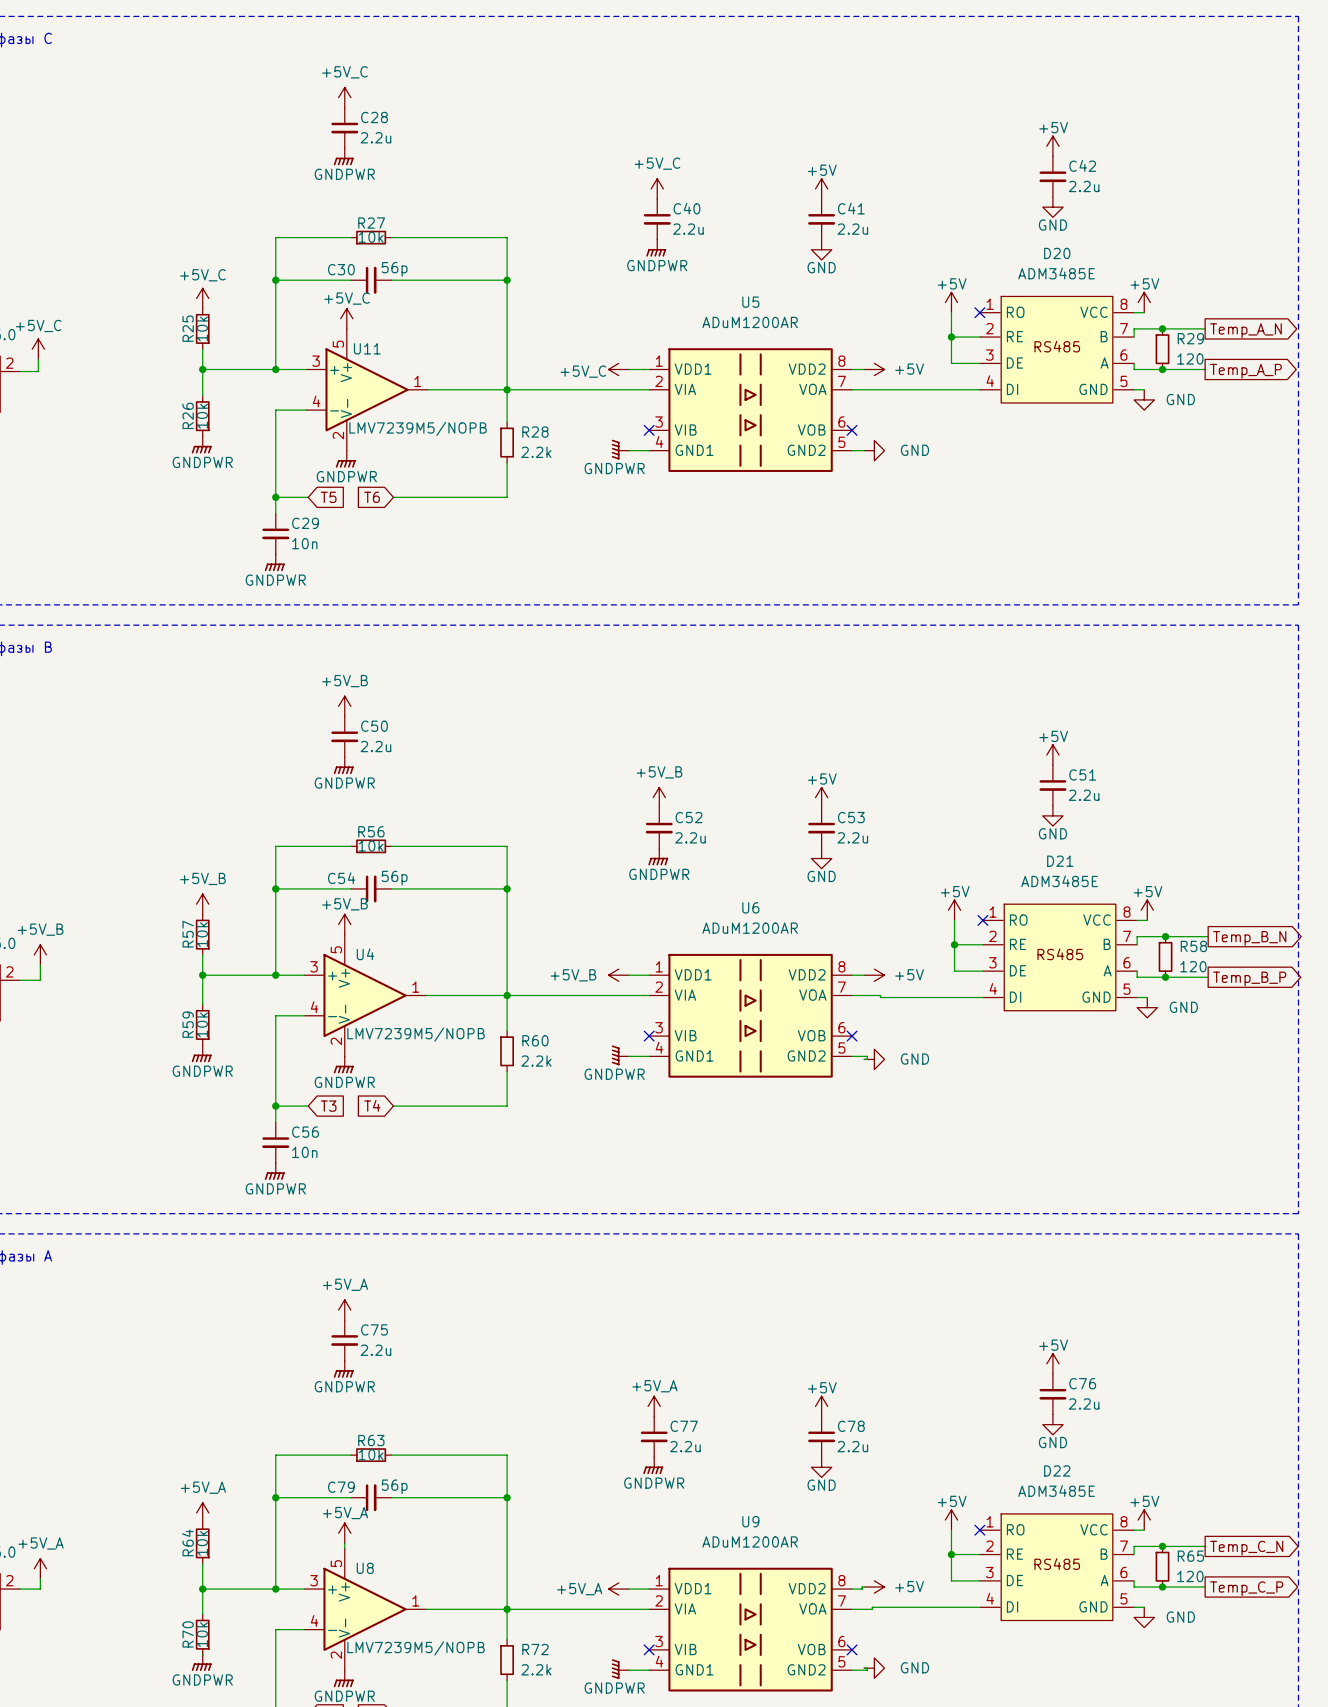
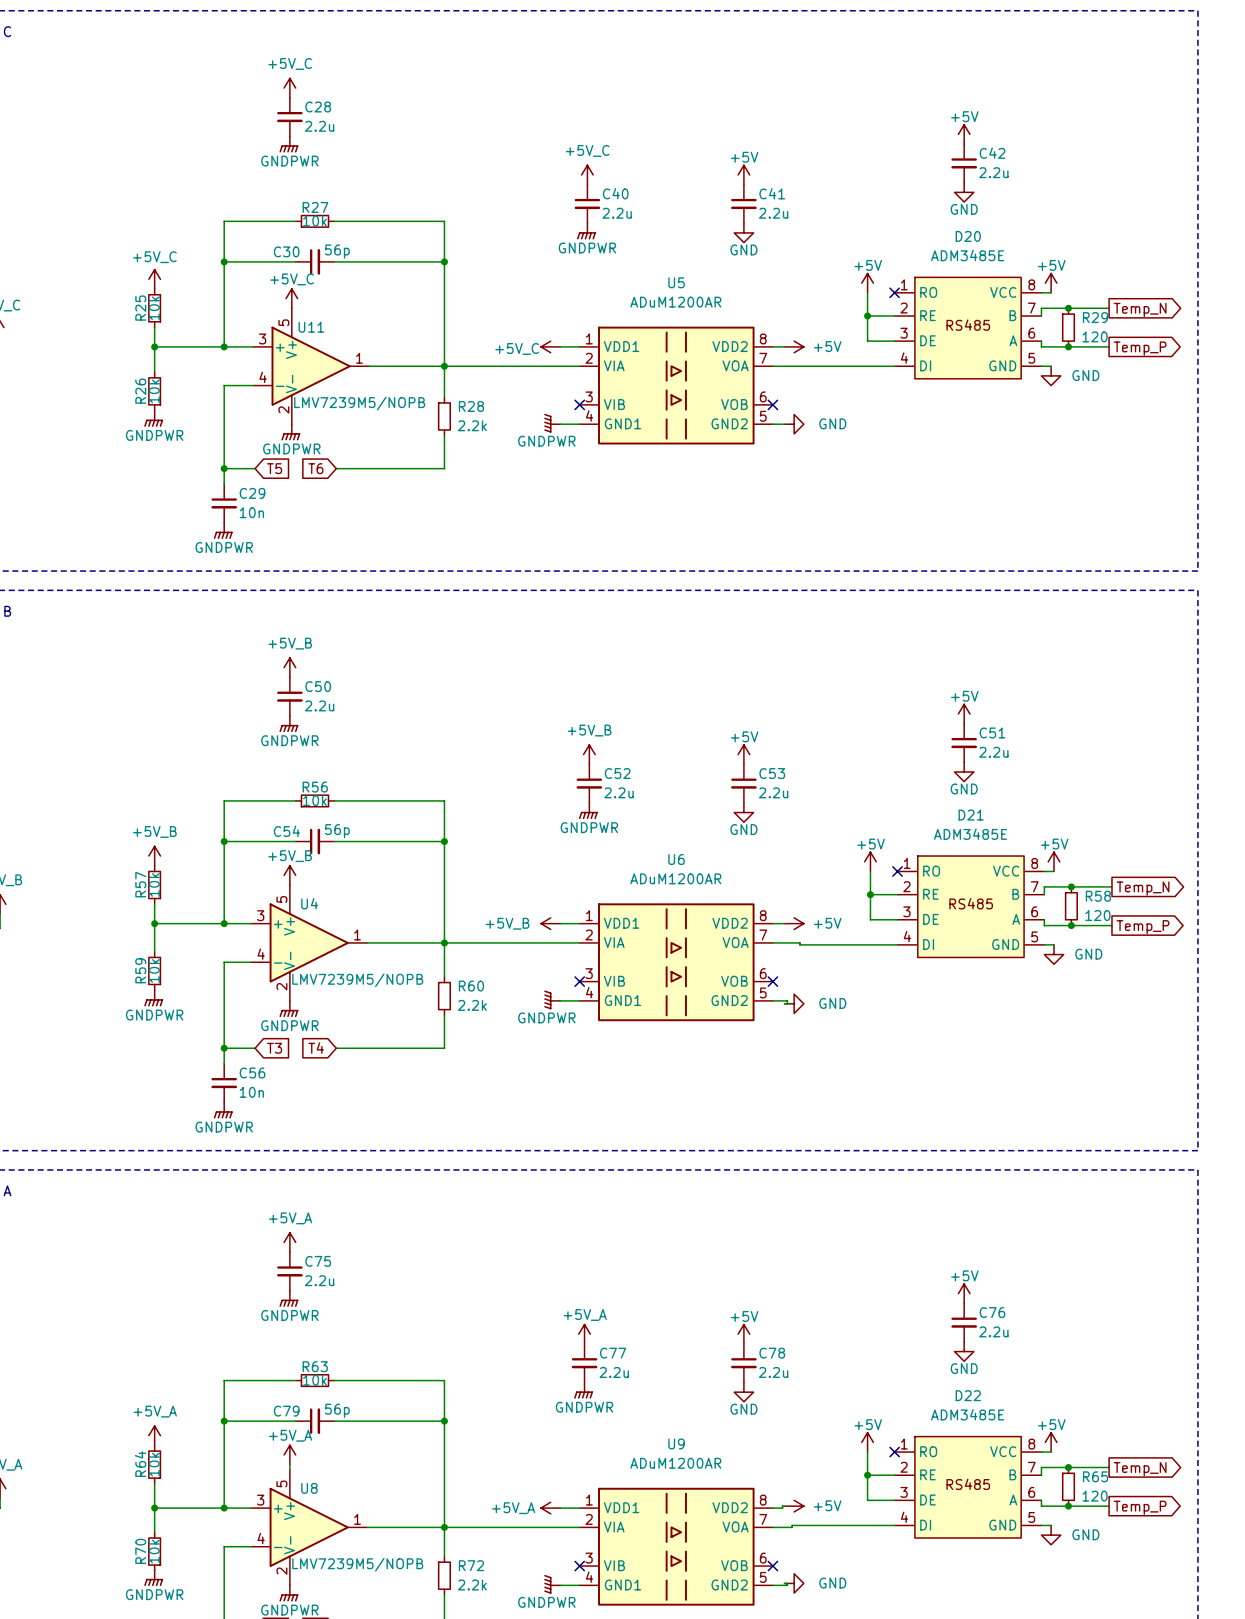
global label: Temp_A_N (1245, 330) -> Temp_N (1140, 309)
global label: Temp_A_P (1245, 371) -> Temp_P (1140, 348)
global label: Temp_B_N (1249, 938) -> Temp_N (1143, 888)
global label: Temp_B_P (1249, 978) -> Temp_P (1143, 927)
global label: Temp_C_N (1246, 1548) -> Temp_N (1140, 1469)
global label: Temp_C_P (1246, 1588) -> Temp_P (1140, 1507)

